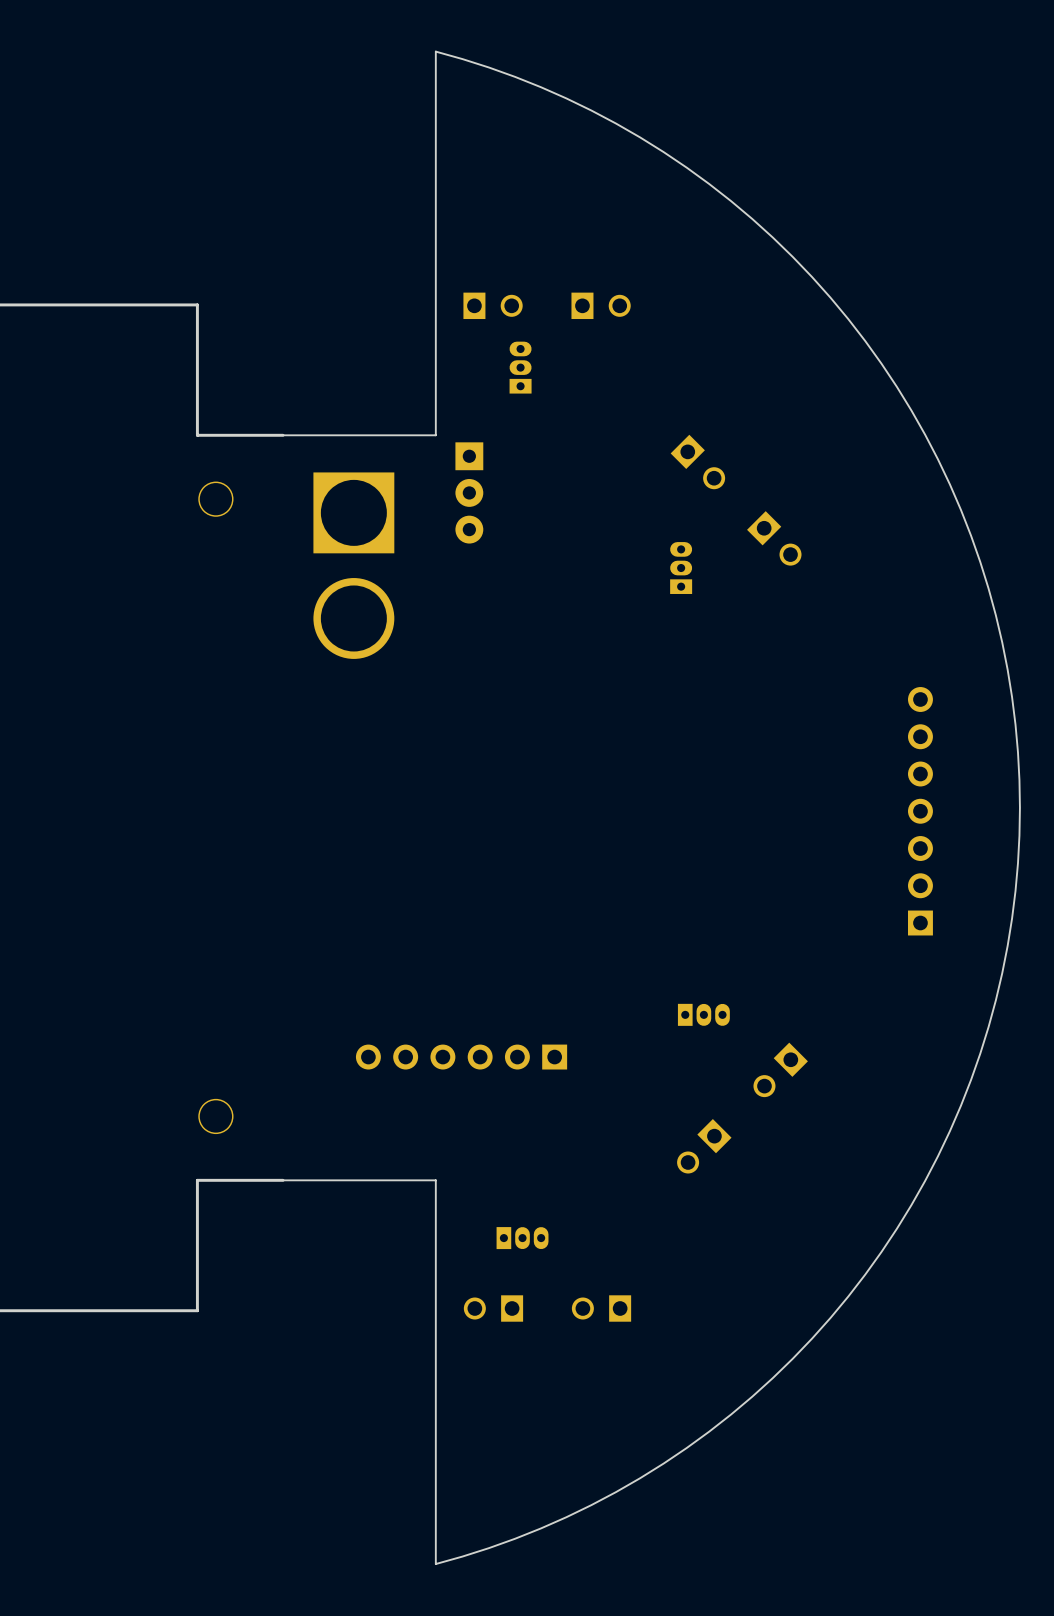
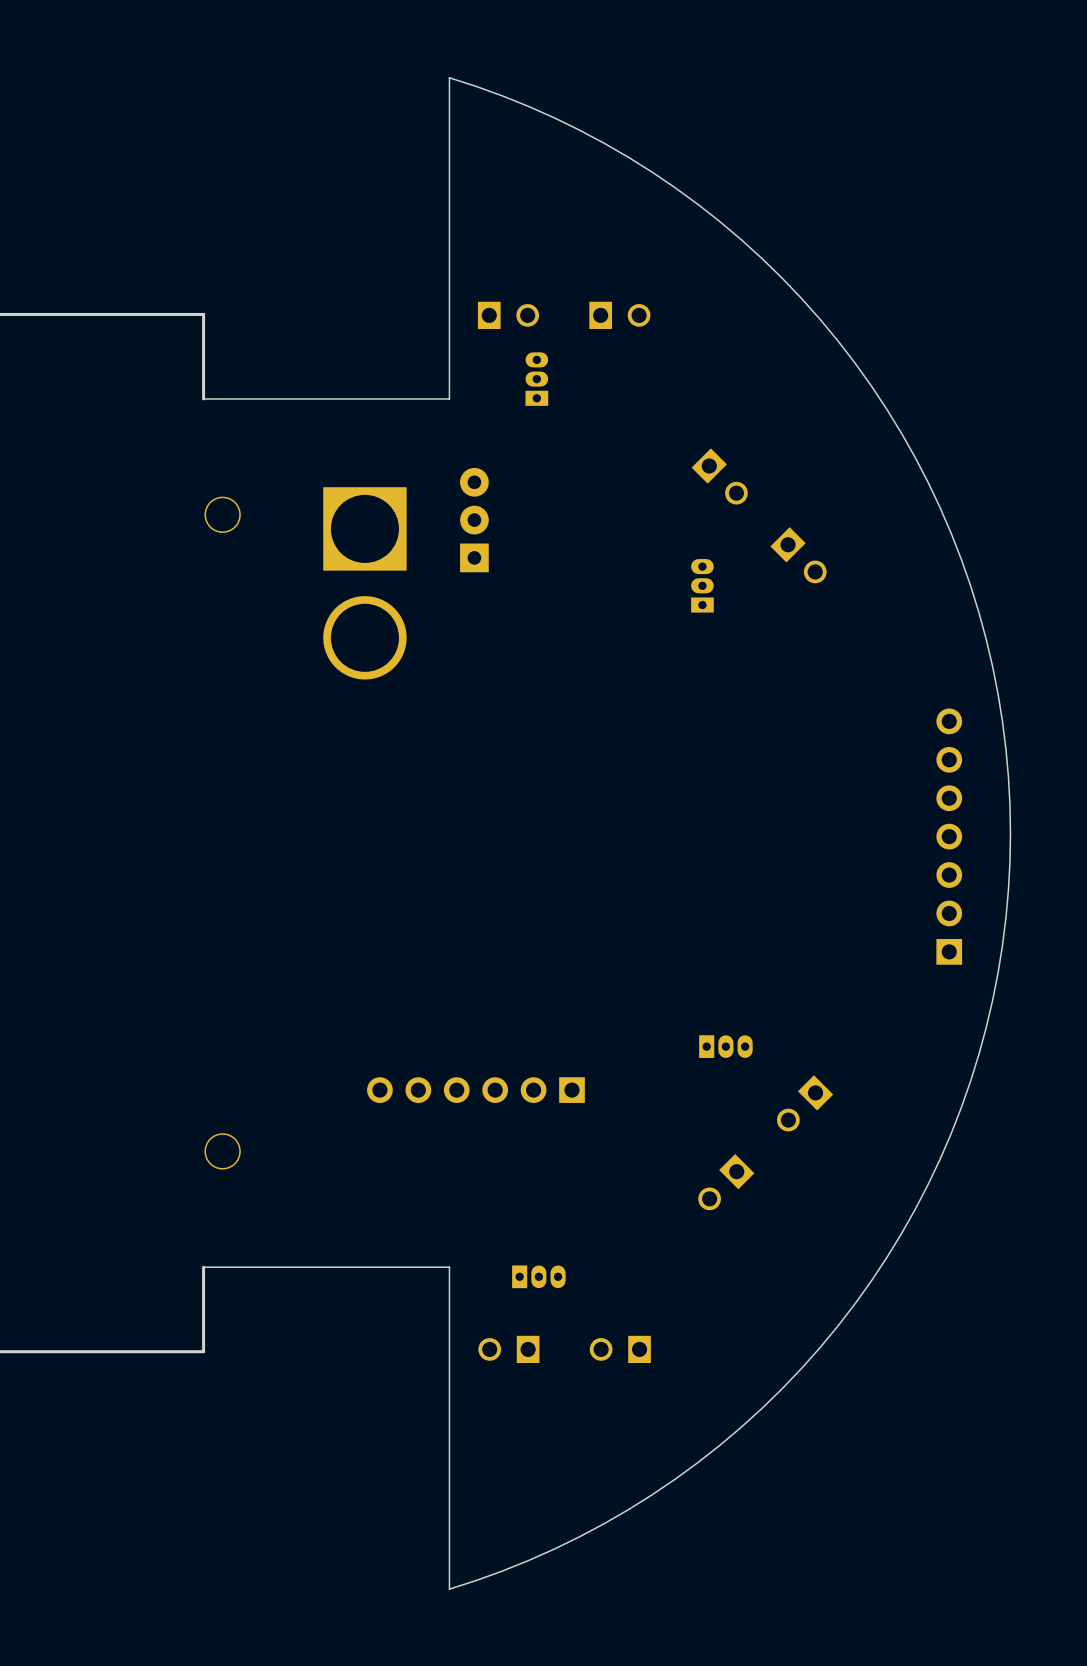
board edge: (435, 75) (435, 51) (489, 67) (541, 87) (591, 110) (640, 137) (709, 183) (752, 218) (812, 277) (848, 319) (896, 386) (925, 434) (949, 484) (980, 561) (995, 615) (1007, 669) (1017, 752) (1019, 807) (1015, 891) (1007, 946) (995, 1000) (971, 1079) (949, 1131) (911, 1205) (881, 1251) (848, 1296) (812, 1338) (752, 1396) (709, 1431) (640, 1478) (591, 1505) (541, 1528) (489, 1548) (435, 1564) (435, 1540) -> (449, 77) (502, 95) (554, 117) (603, 143) (675, 187) (719, 221) (761, 258) (801, 298) (854, 362) (886, 409) (915, 457) (939, 507) (970, 585) (992, 666) (1002, 721) (1008, 777) (1010, 833) (1008, 889) (998, 972) (986, 1027) (970, 1081) (951, 1133) (927, 1184) (901, 1234) (854, 1304) (819, 1347) (781, 1388) (719, 1445) (675, 1479) (628, 1509) (579, 1536) (528, 1560) (449, 1589)
board edge: (435, 386) (435, 435) (197, 435) (197, 386) -> (449, 398) (203, 398)
part rotation: 0° (469, 492) -> 180° (474, 520)
board edge: (435, 1228) (435, 1180) (197, 1180) (197, 1228) -> (449, 1267) (203, 1267)

